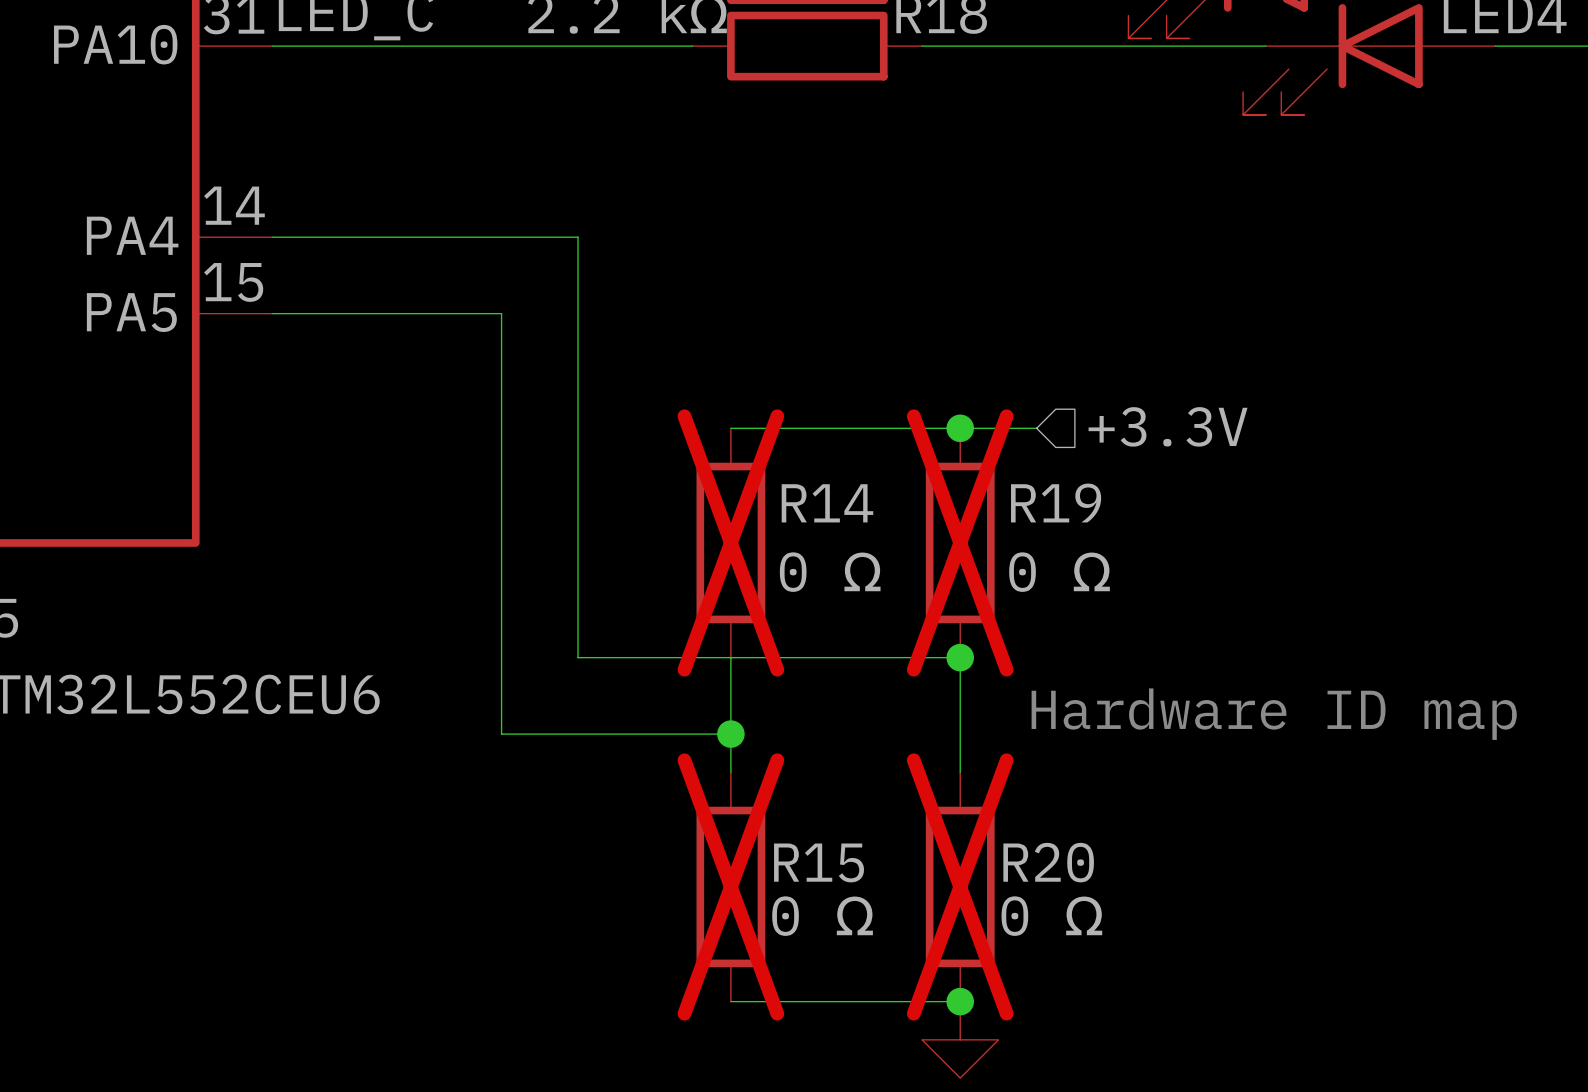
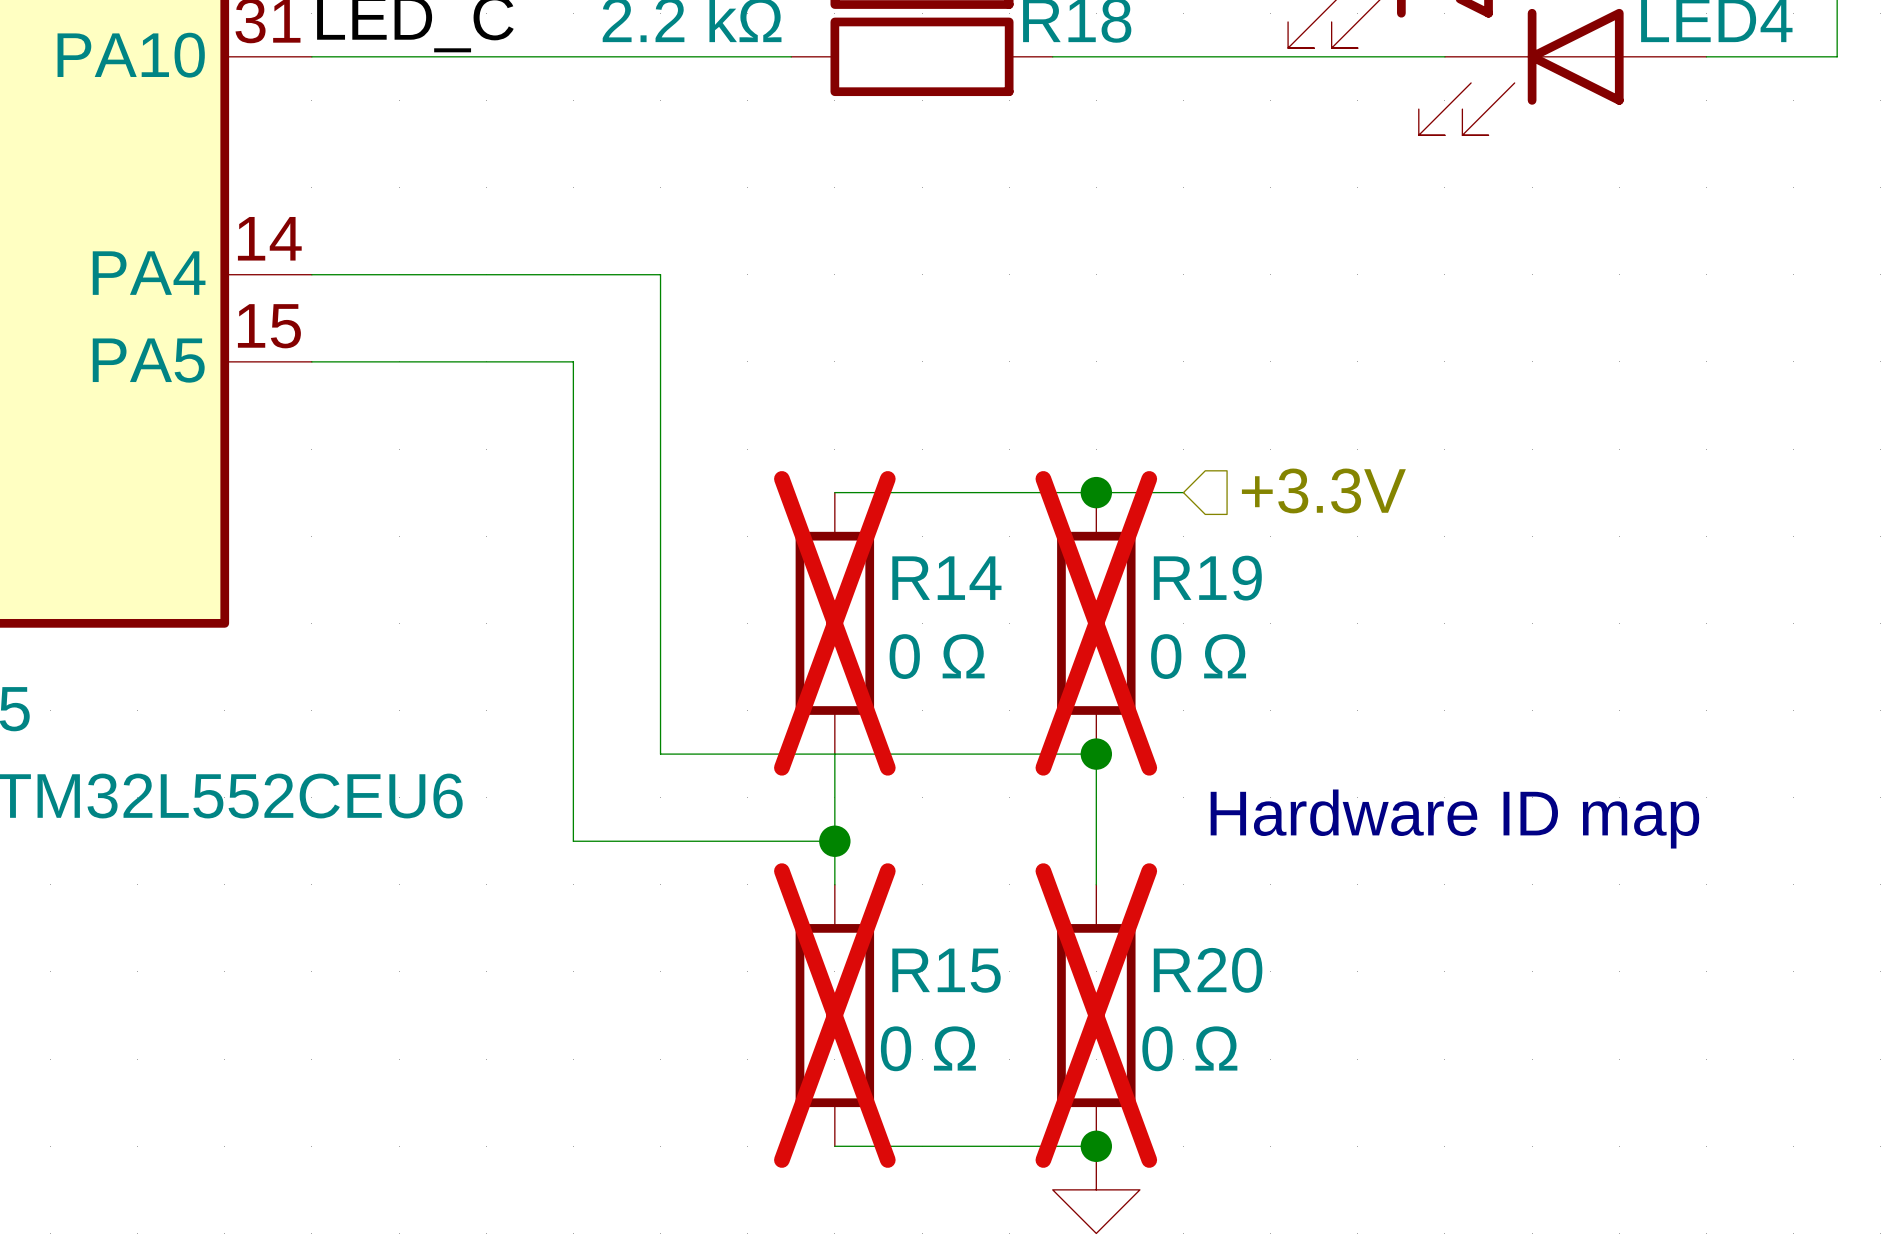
R15 name position: R15 (819, 862) -> R15 (946, 970)
R20 name position: R20 (1048, 862) -> R20 (1208, 970)

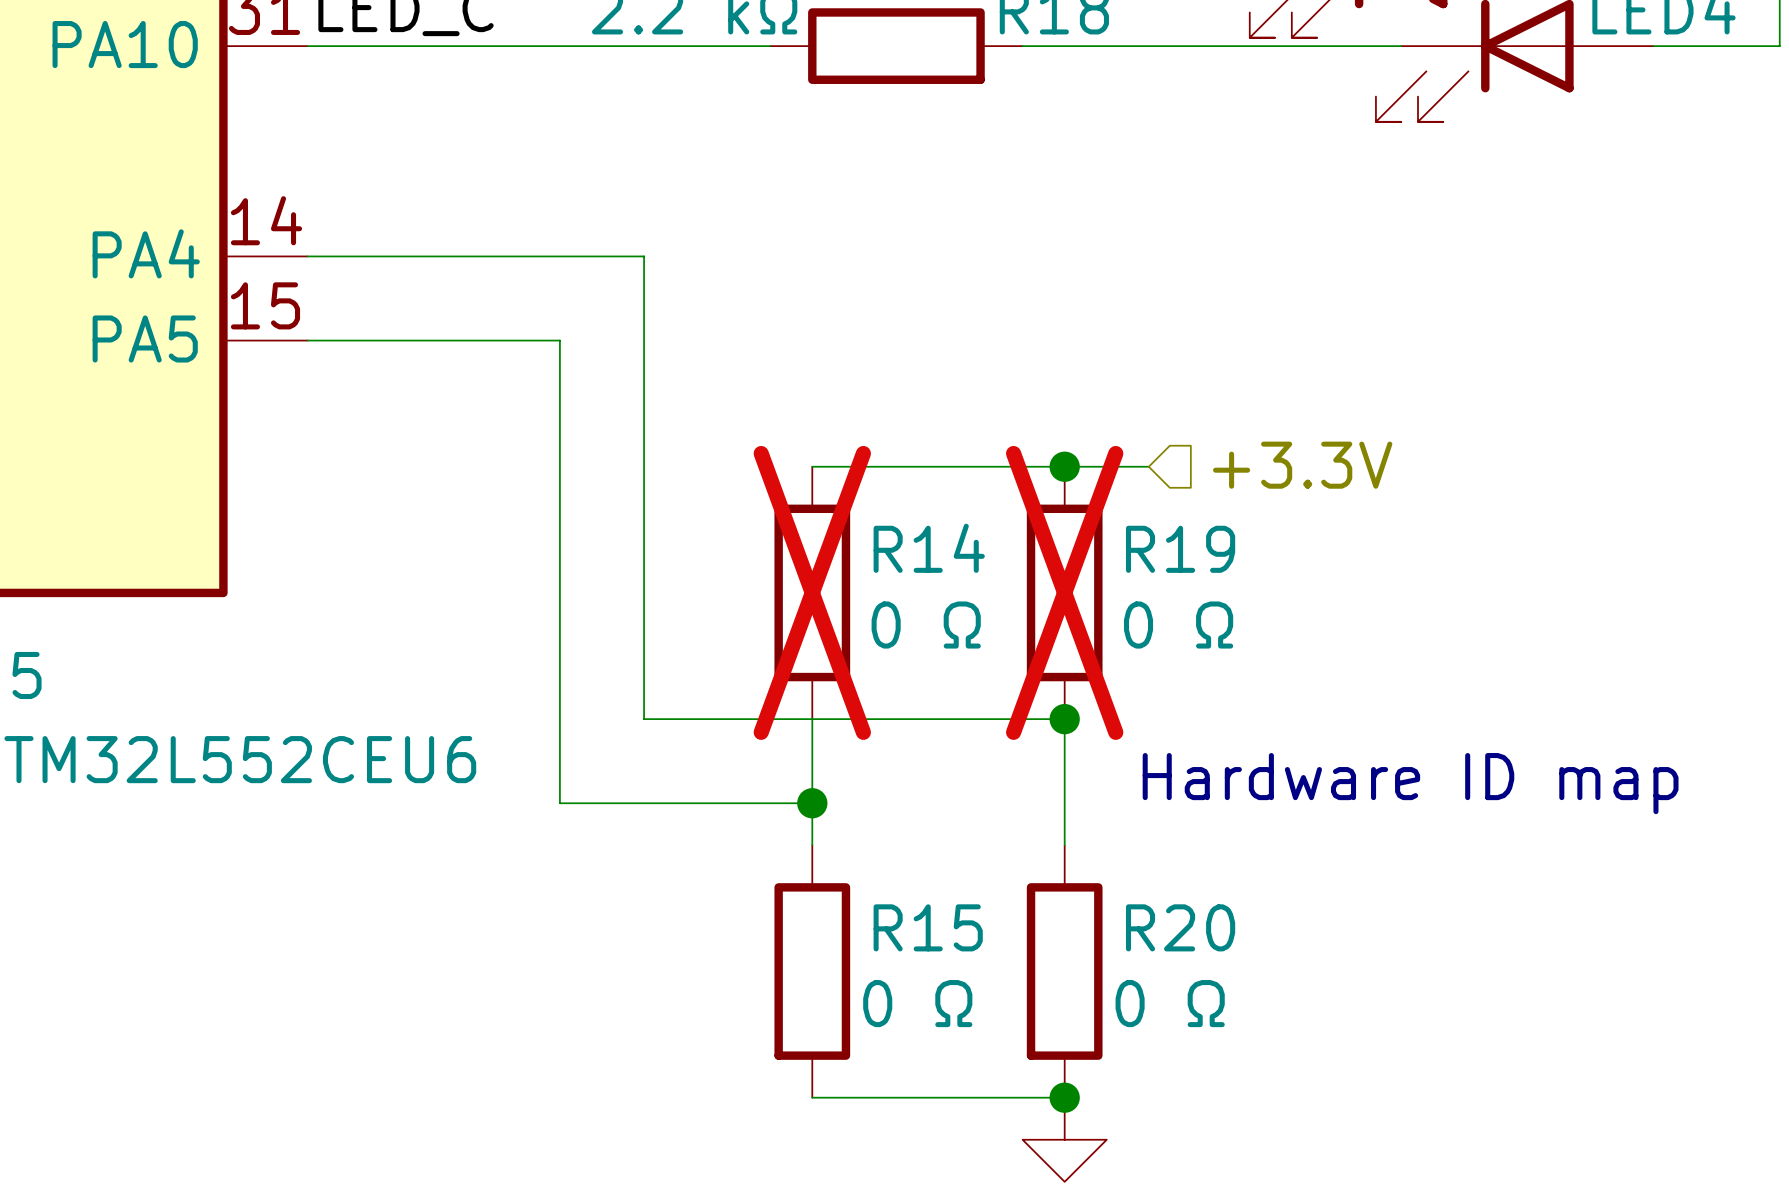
R15 do-not-place cross: (834, 1015) -> none
R20 do-not-place cross: (1096, 1015) -> none

